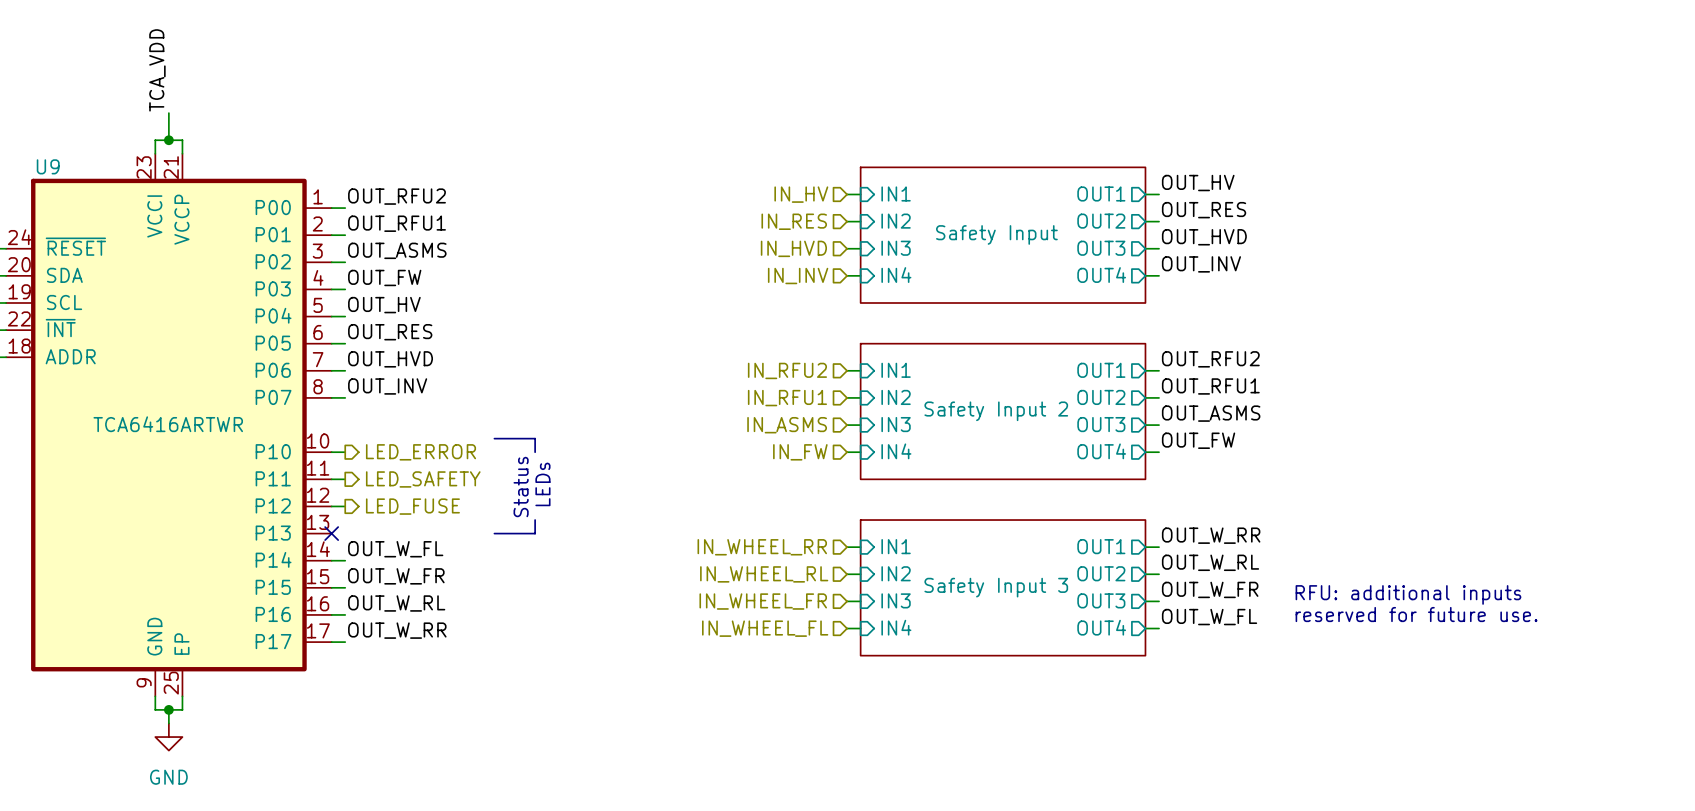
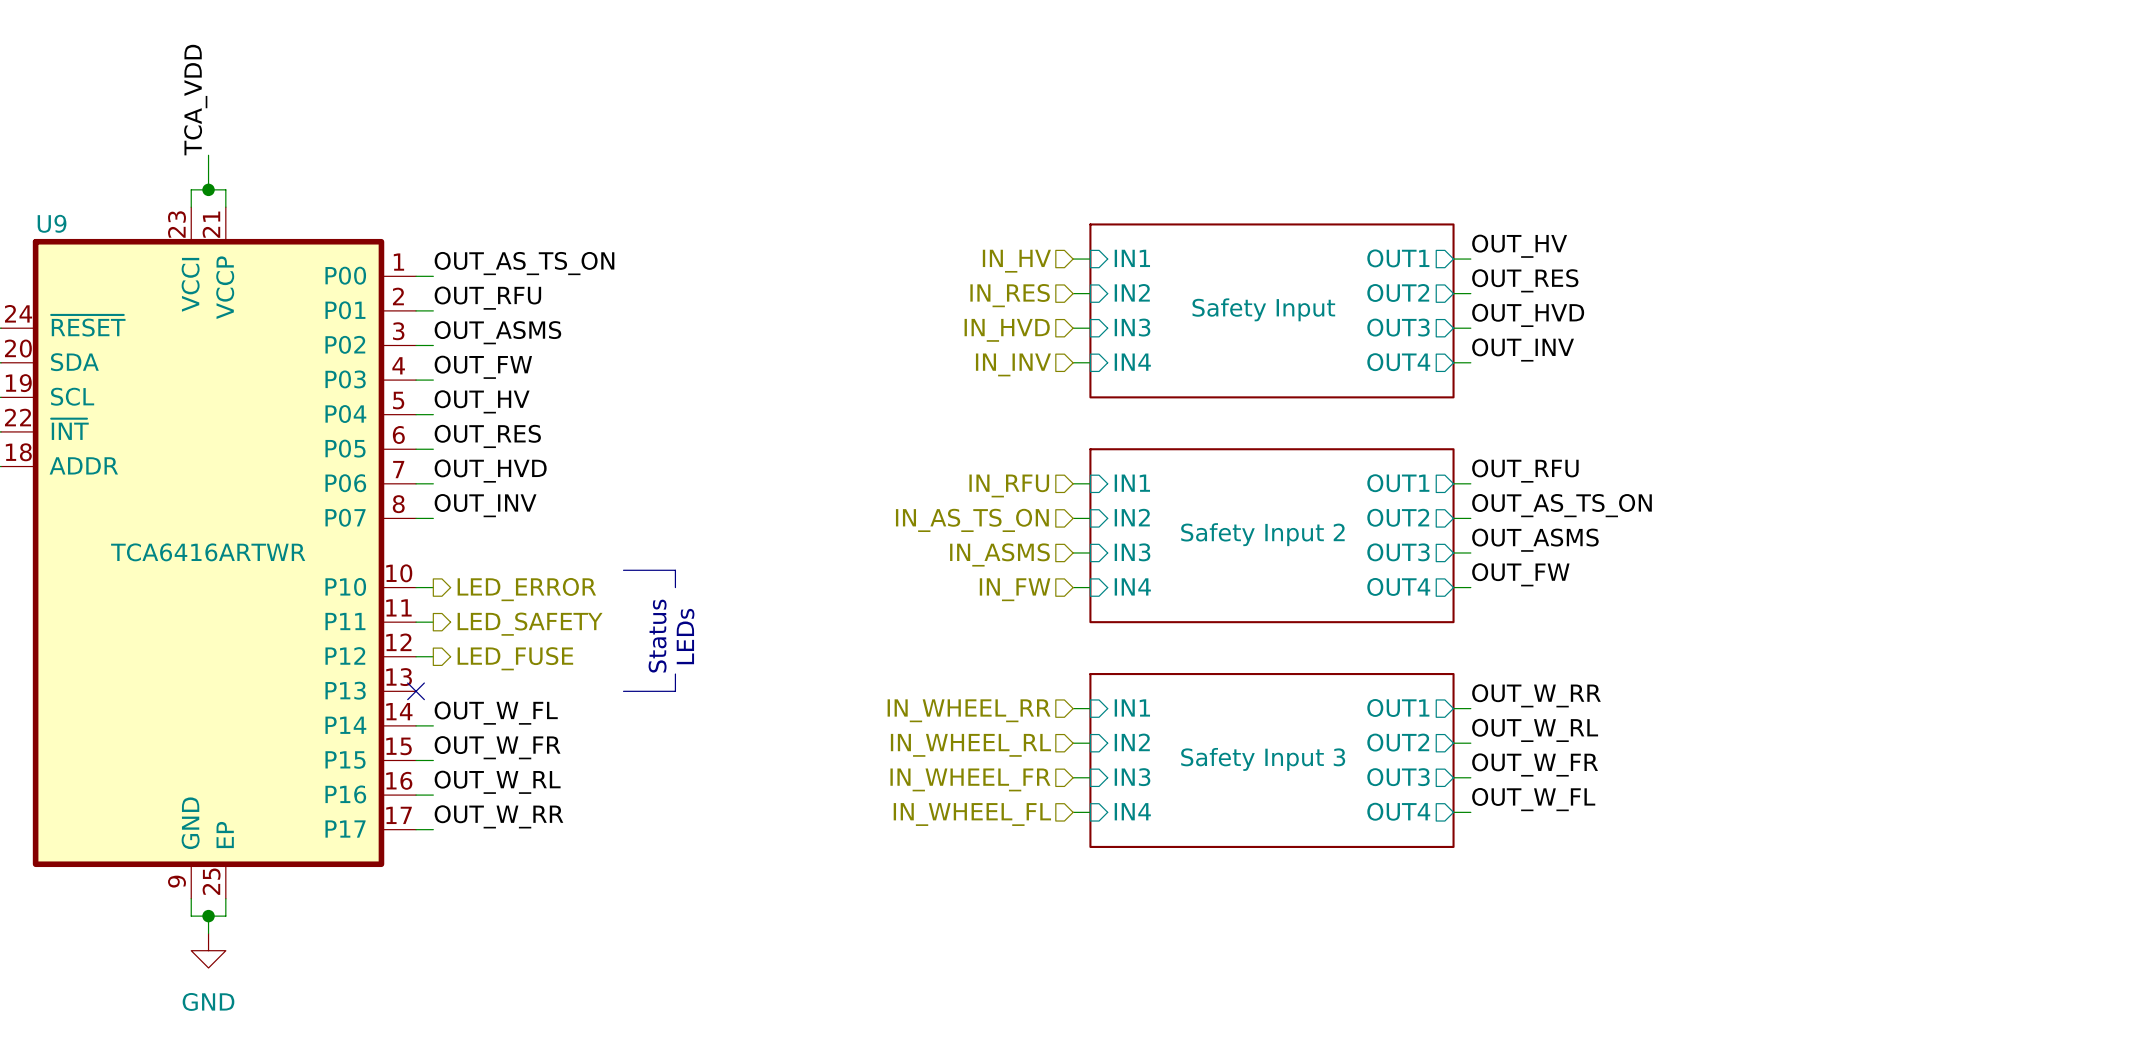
label: OUT_RFU2 (396, 196) -> OUT_AS_TS_ON (524, 263)
label: OUT_RFU1 (396, 223) -> OUT_RFU (487, 298)
label: OUT_RFU2 (1210, 359) -> OUT_RFU (1525, 471)
hierarchical label: IN_RFU2 (787, 370) -> IN_RFU (1009, 485)
label: OUT_RFU1 (1210, 386) -> OUT_AS_TS_ON (1561, 505)
hierarchical label: IN_RFU1 (787, 398) -> IN_AS_TS_ON (972, 520)
text: RFU: additional inputs (1408, 594) -> none
text: reserved for future use. (1416, 614) -> none

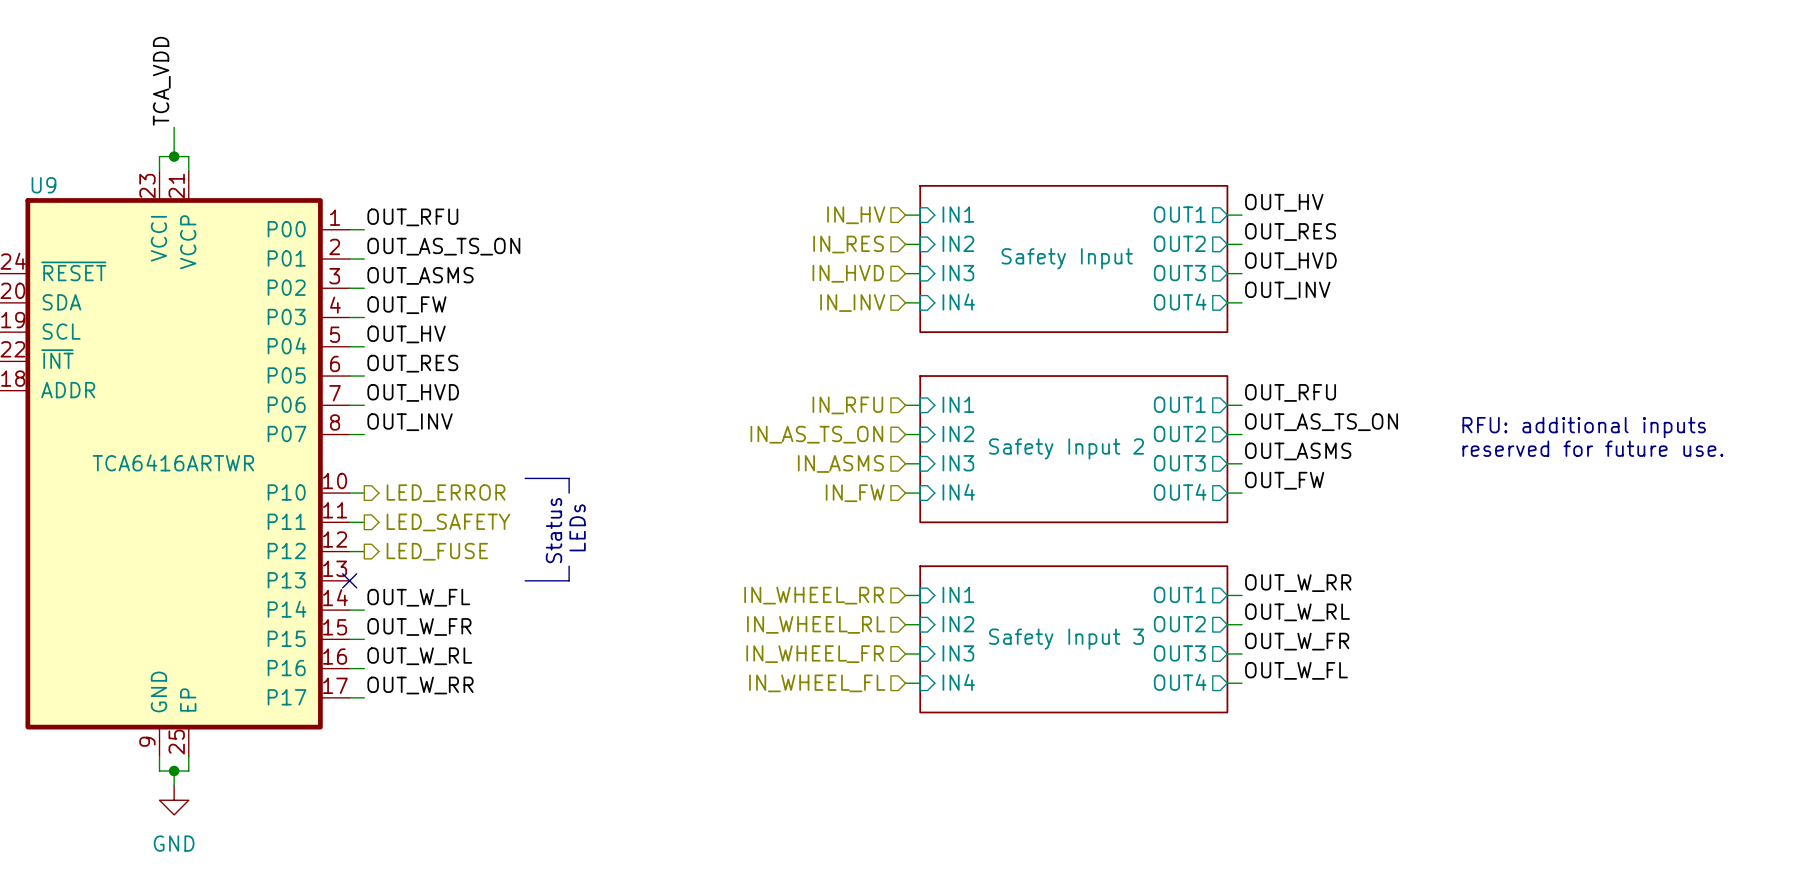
label: OUT_AS_TS_ON (524, 263) -> OUT_RFU (412, 217)
label: OUT_RFU (487, 298) -> OUT_AS_TS_ON (443, 246)
text: none -> RFU: additional inputs (1584, 427)
text: none -> reserved for future use. (1592, 448)

